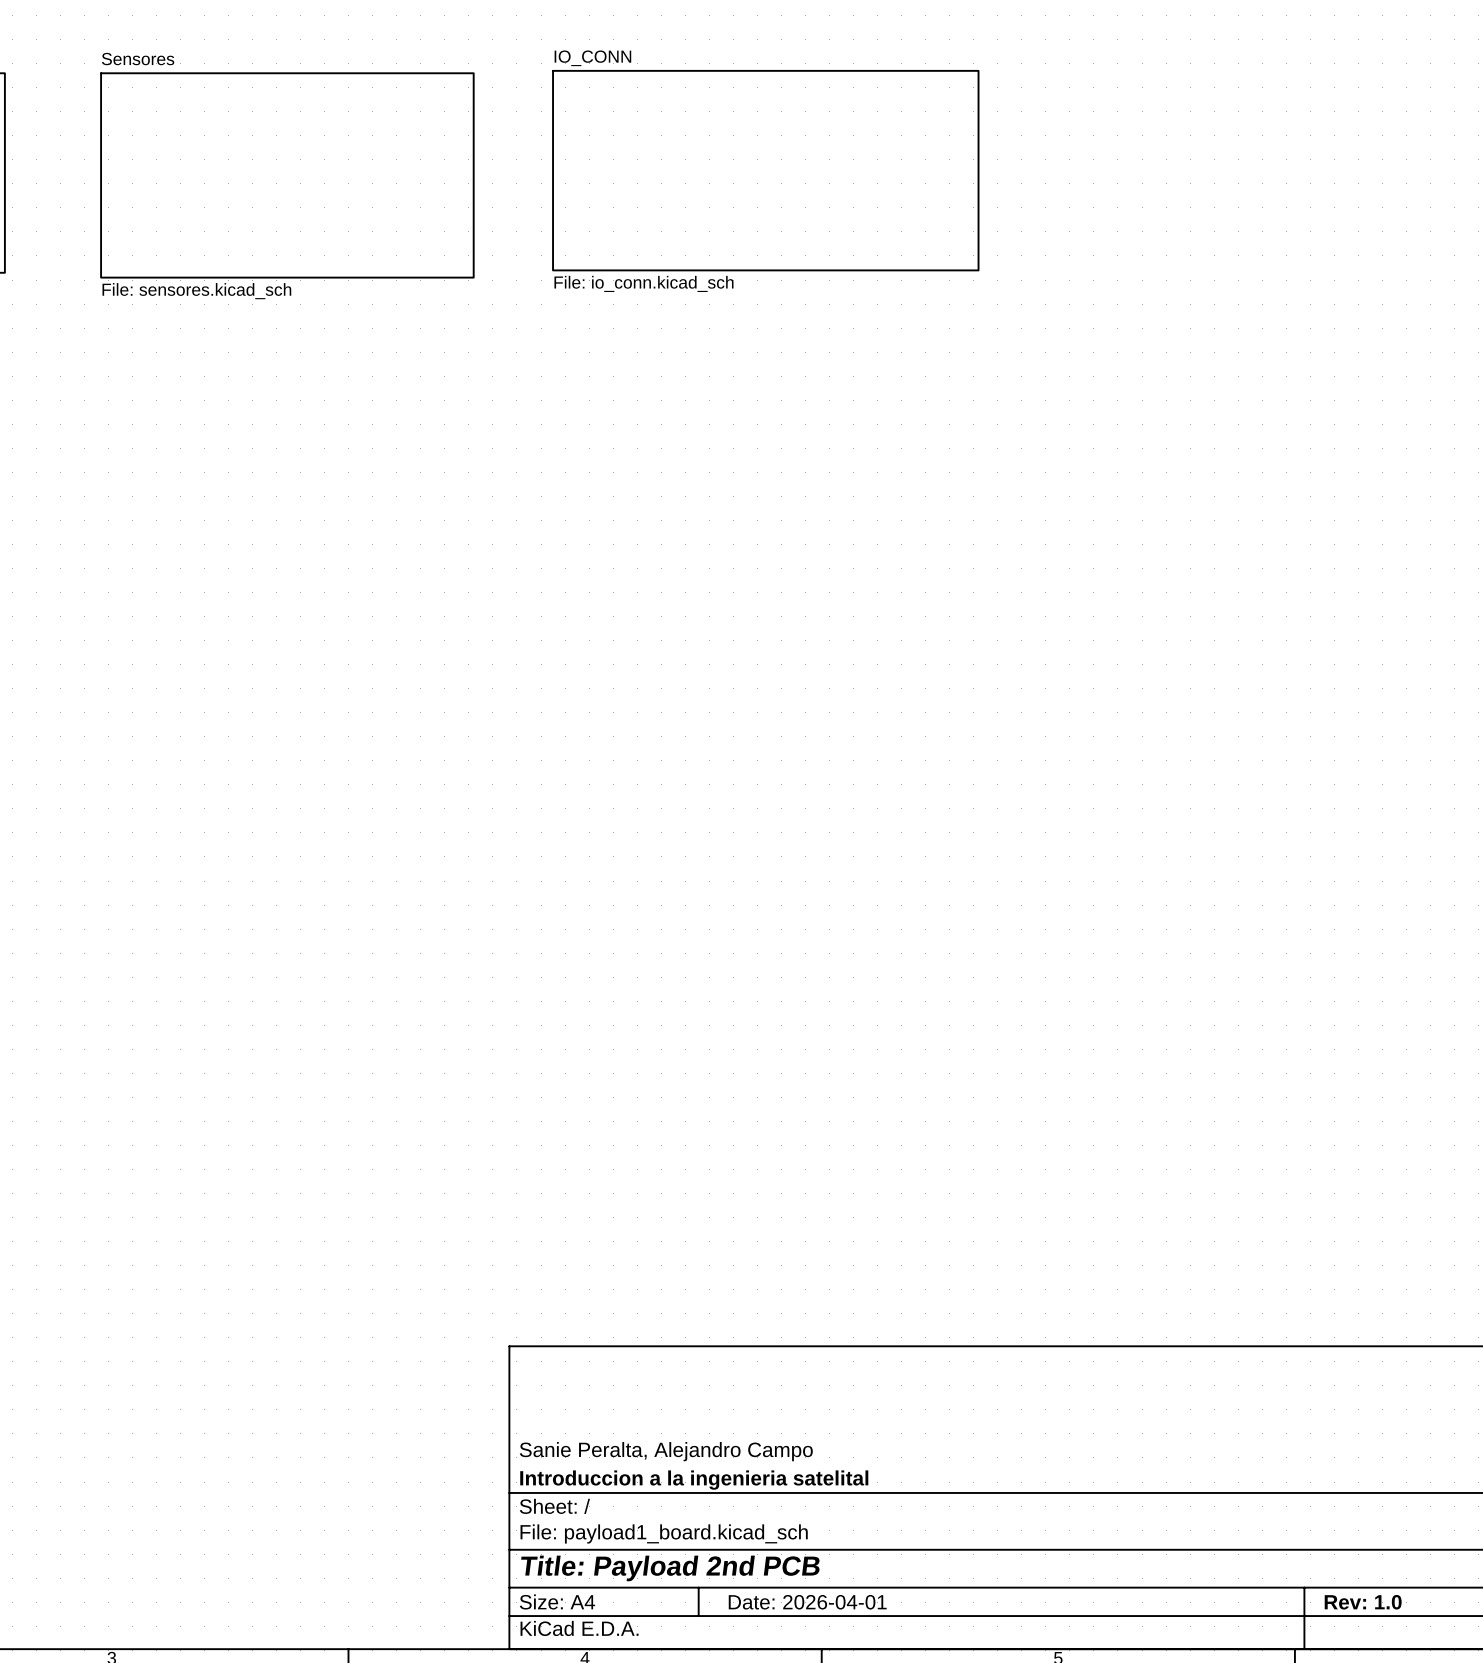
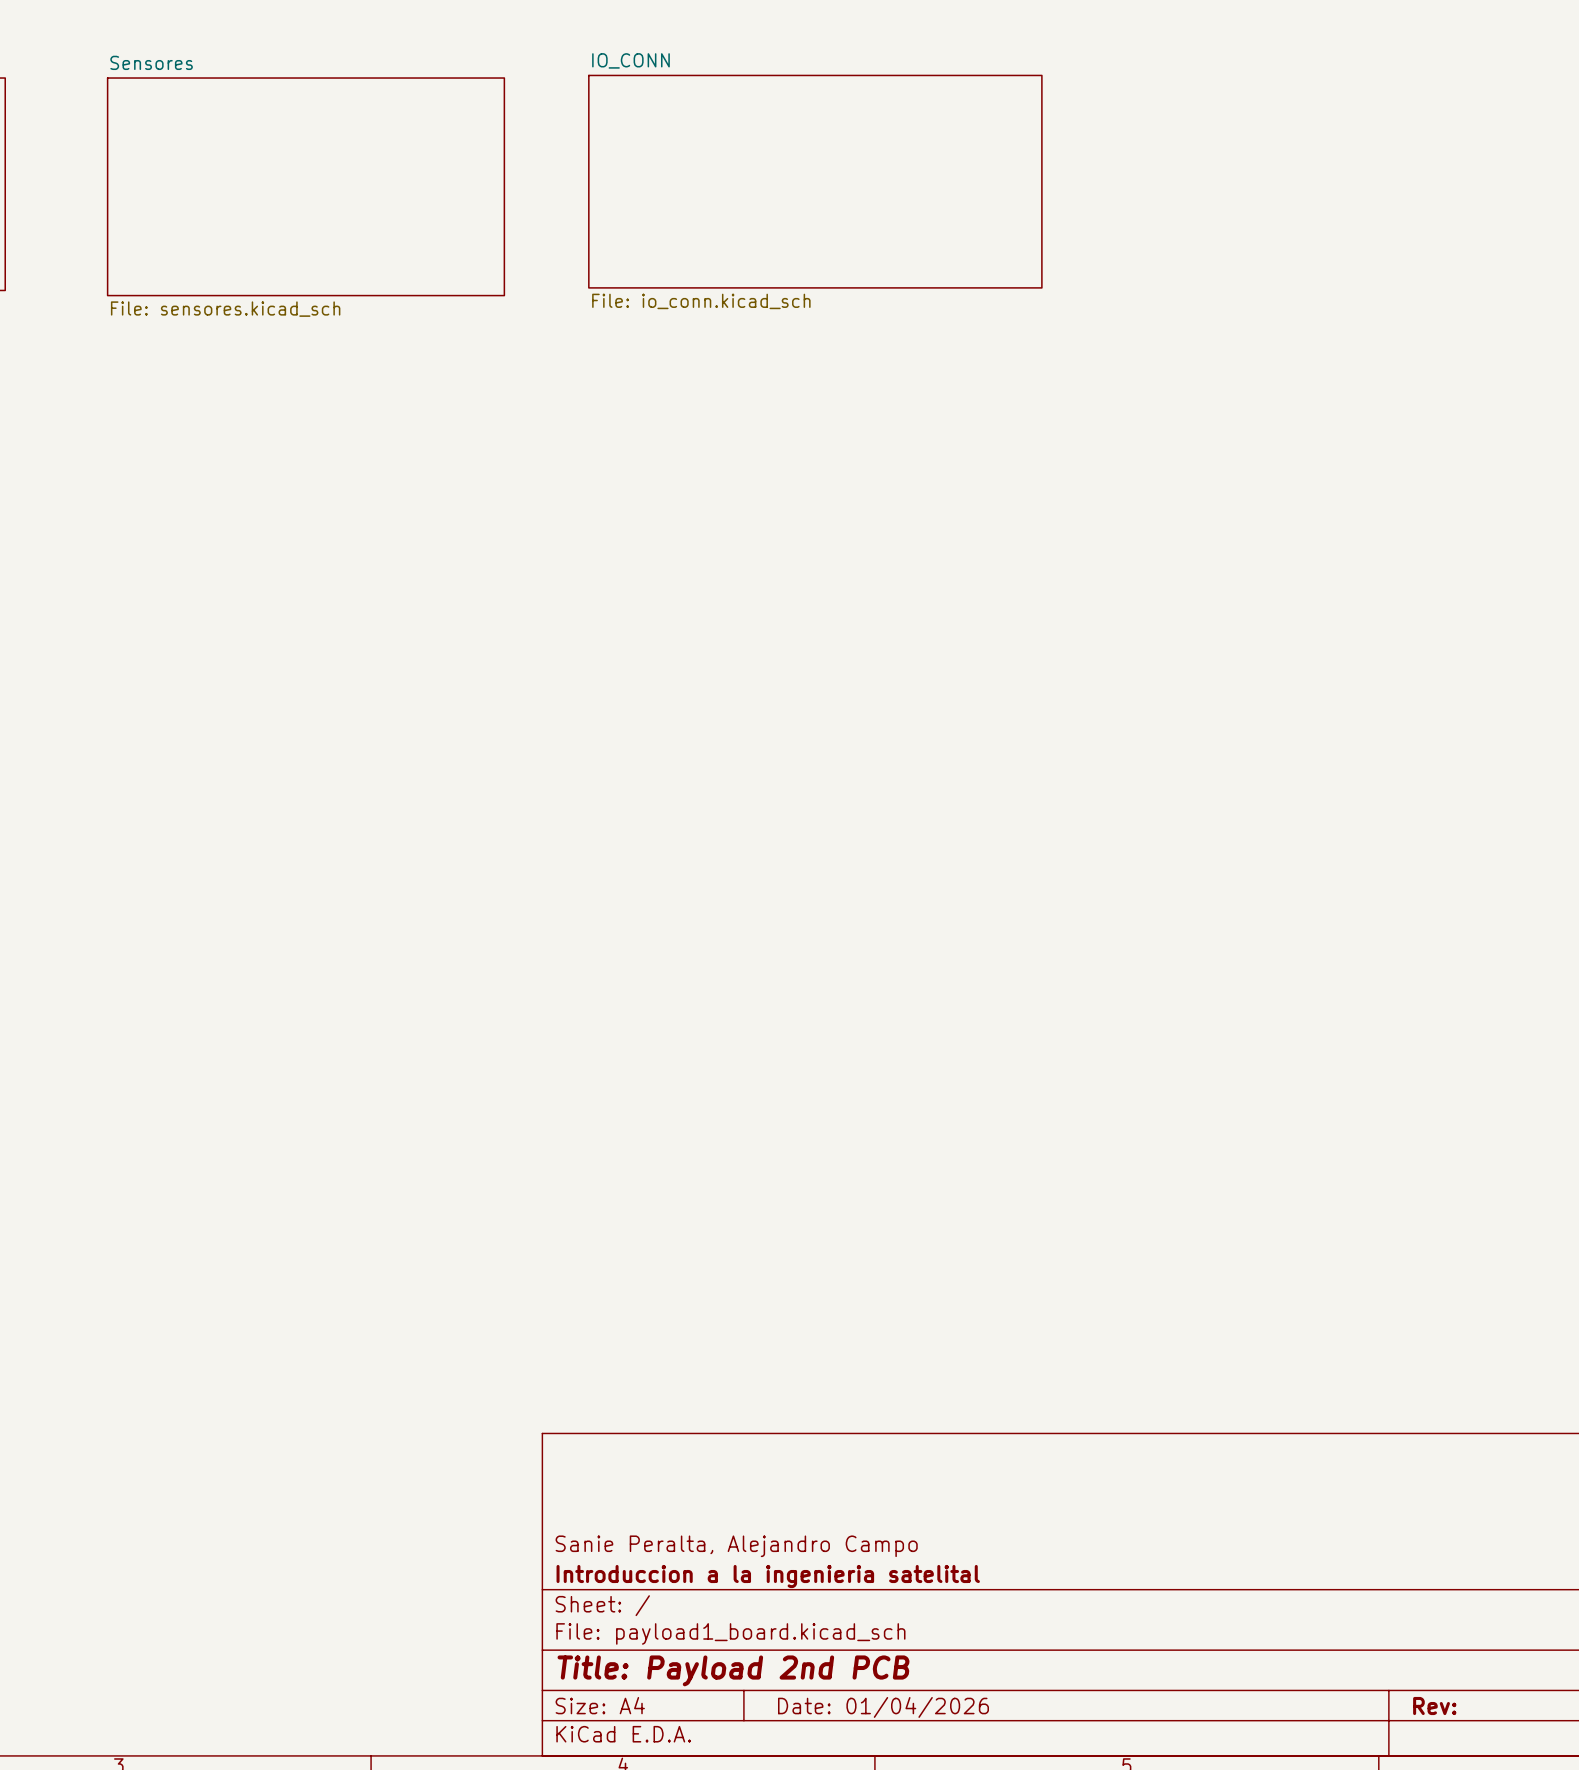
title block: Date: 2026-04-01 (807, 1602) -> Date: 01/04/2026 (883, 1707)
title block: Rev: 1.0 (1363, 1602) -> Rev: (1434, 1706)

